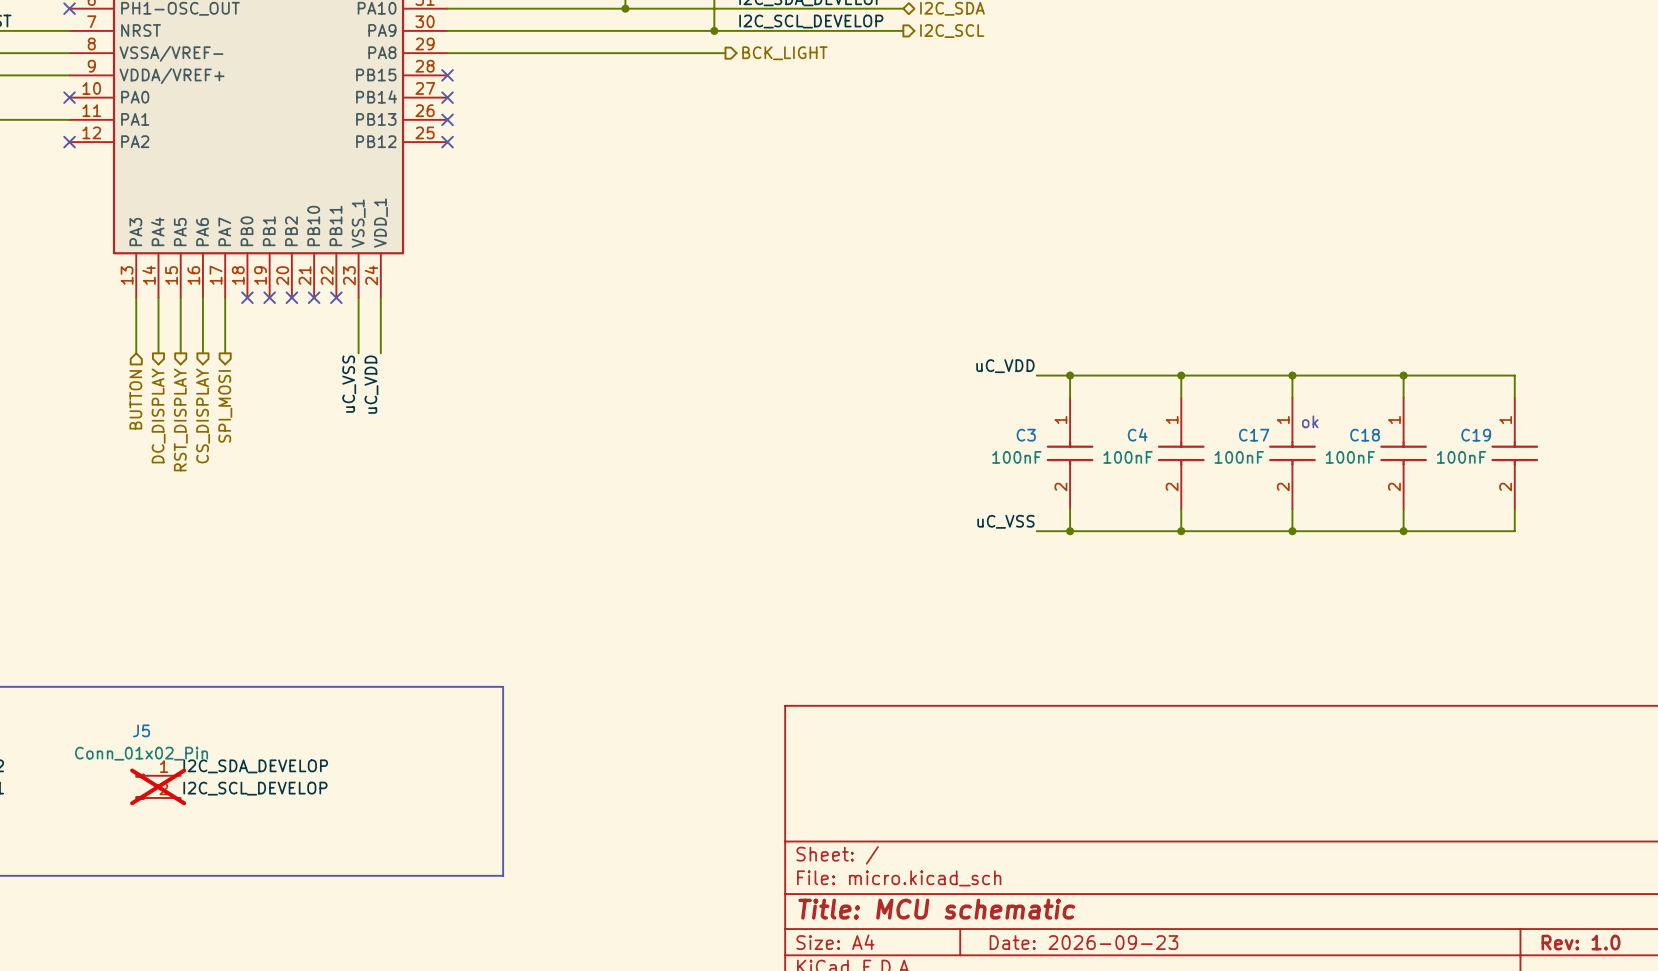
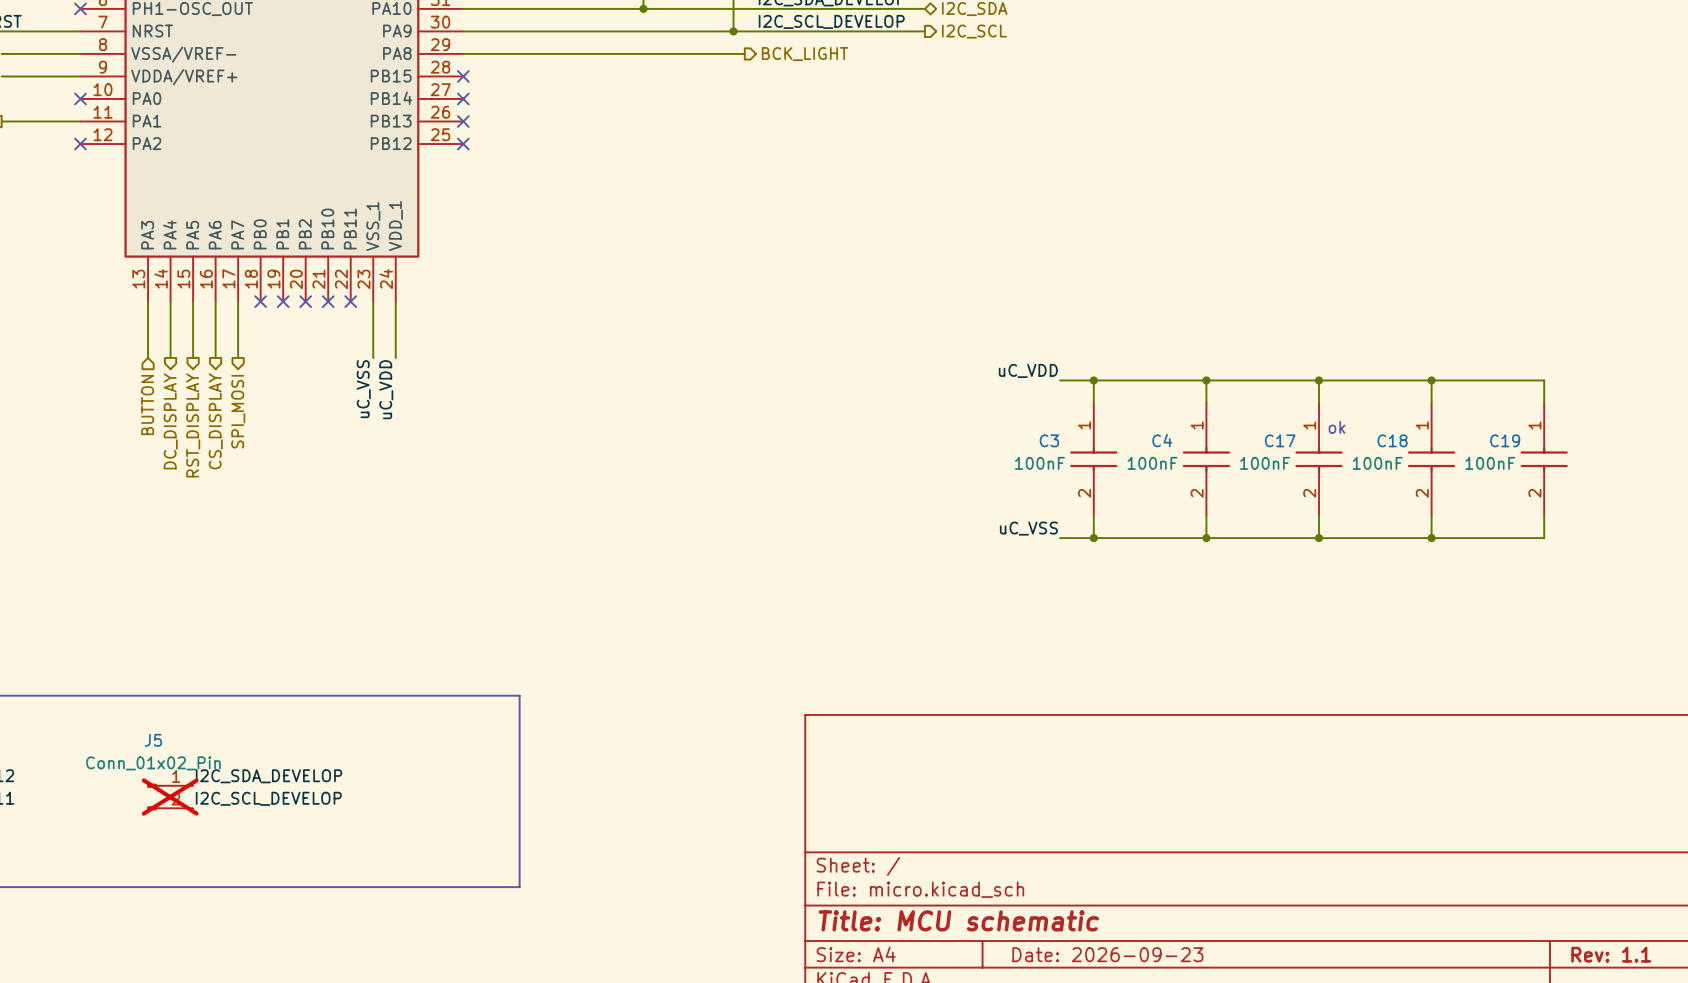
title block: Rev: 1.0 (1580, 942) -> Rev: 1.1 (1611, 954)

